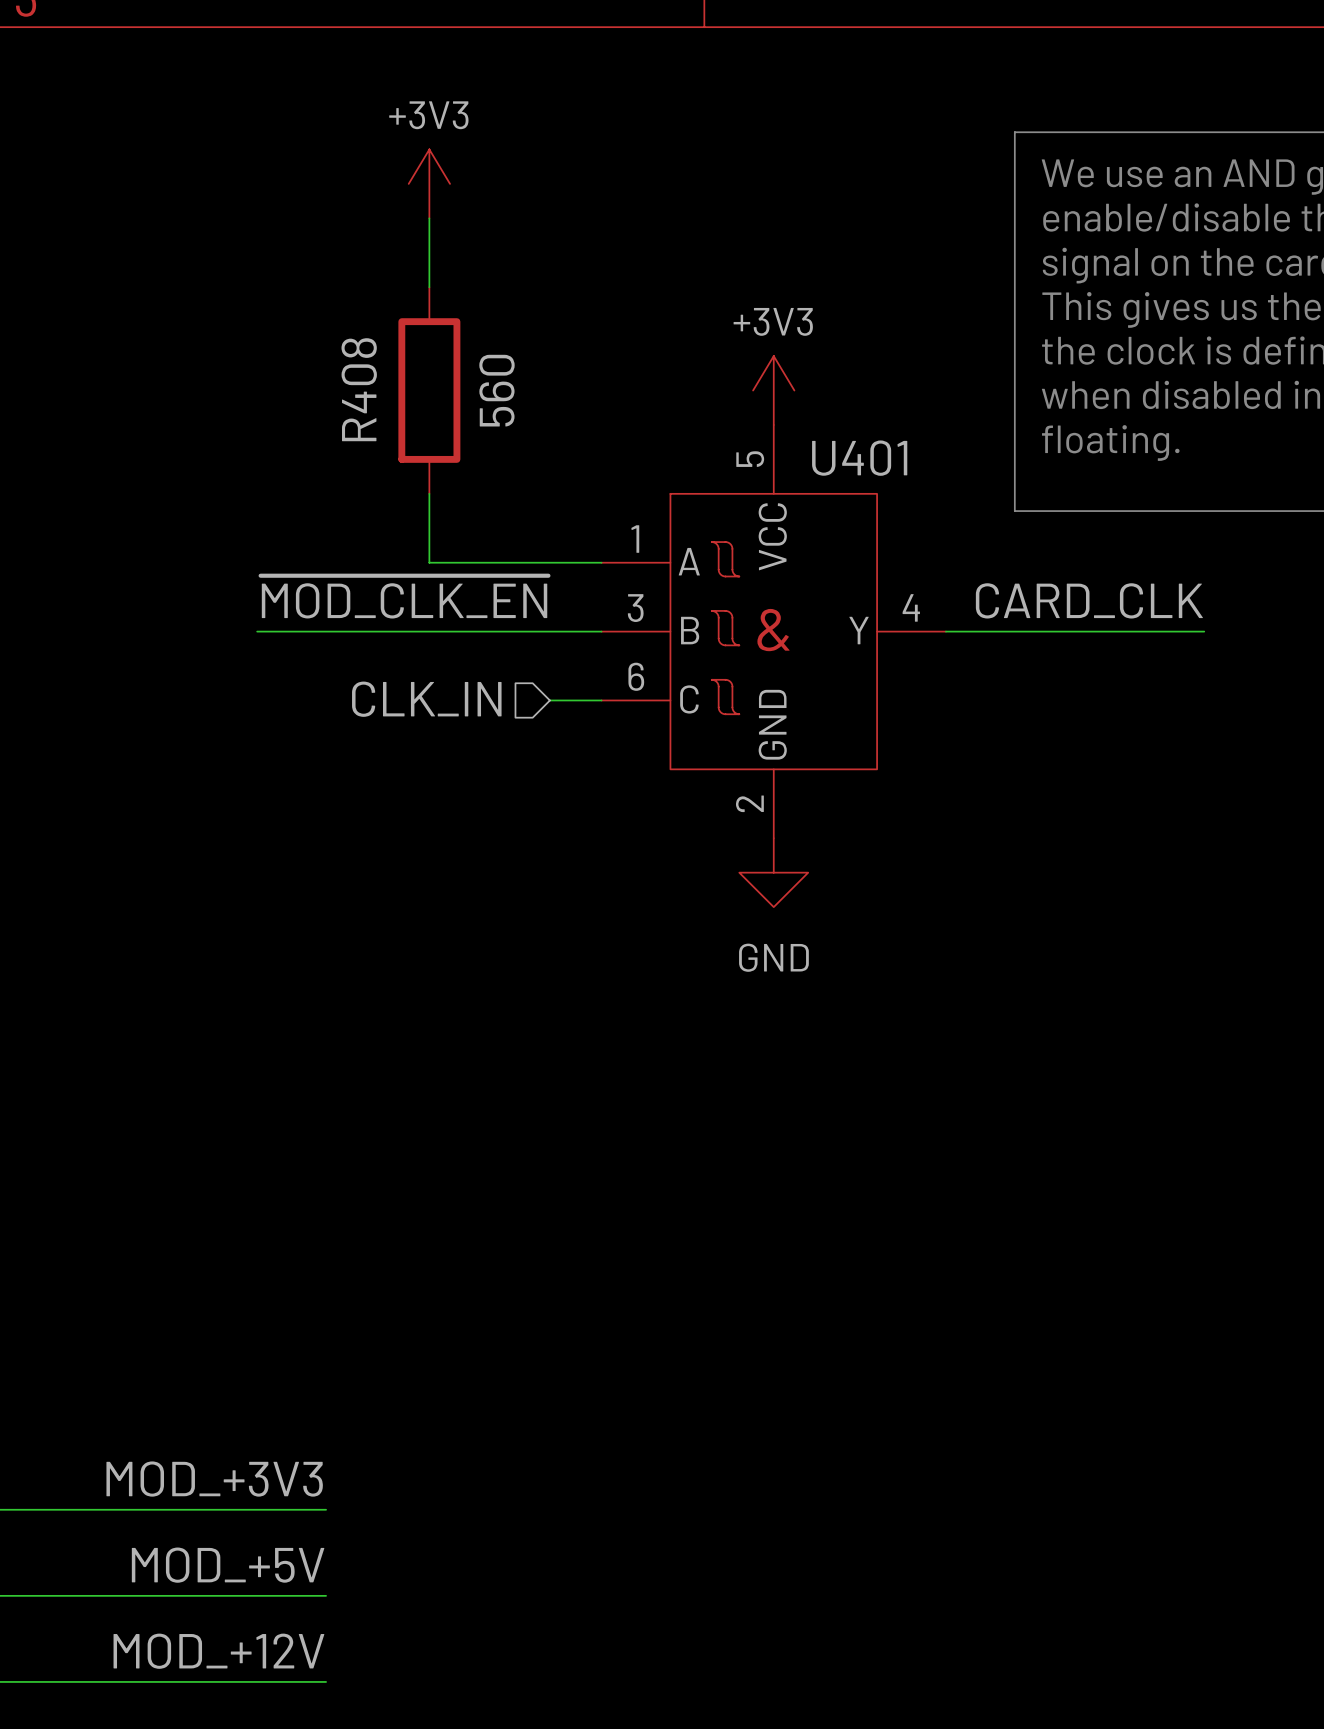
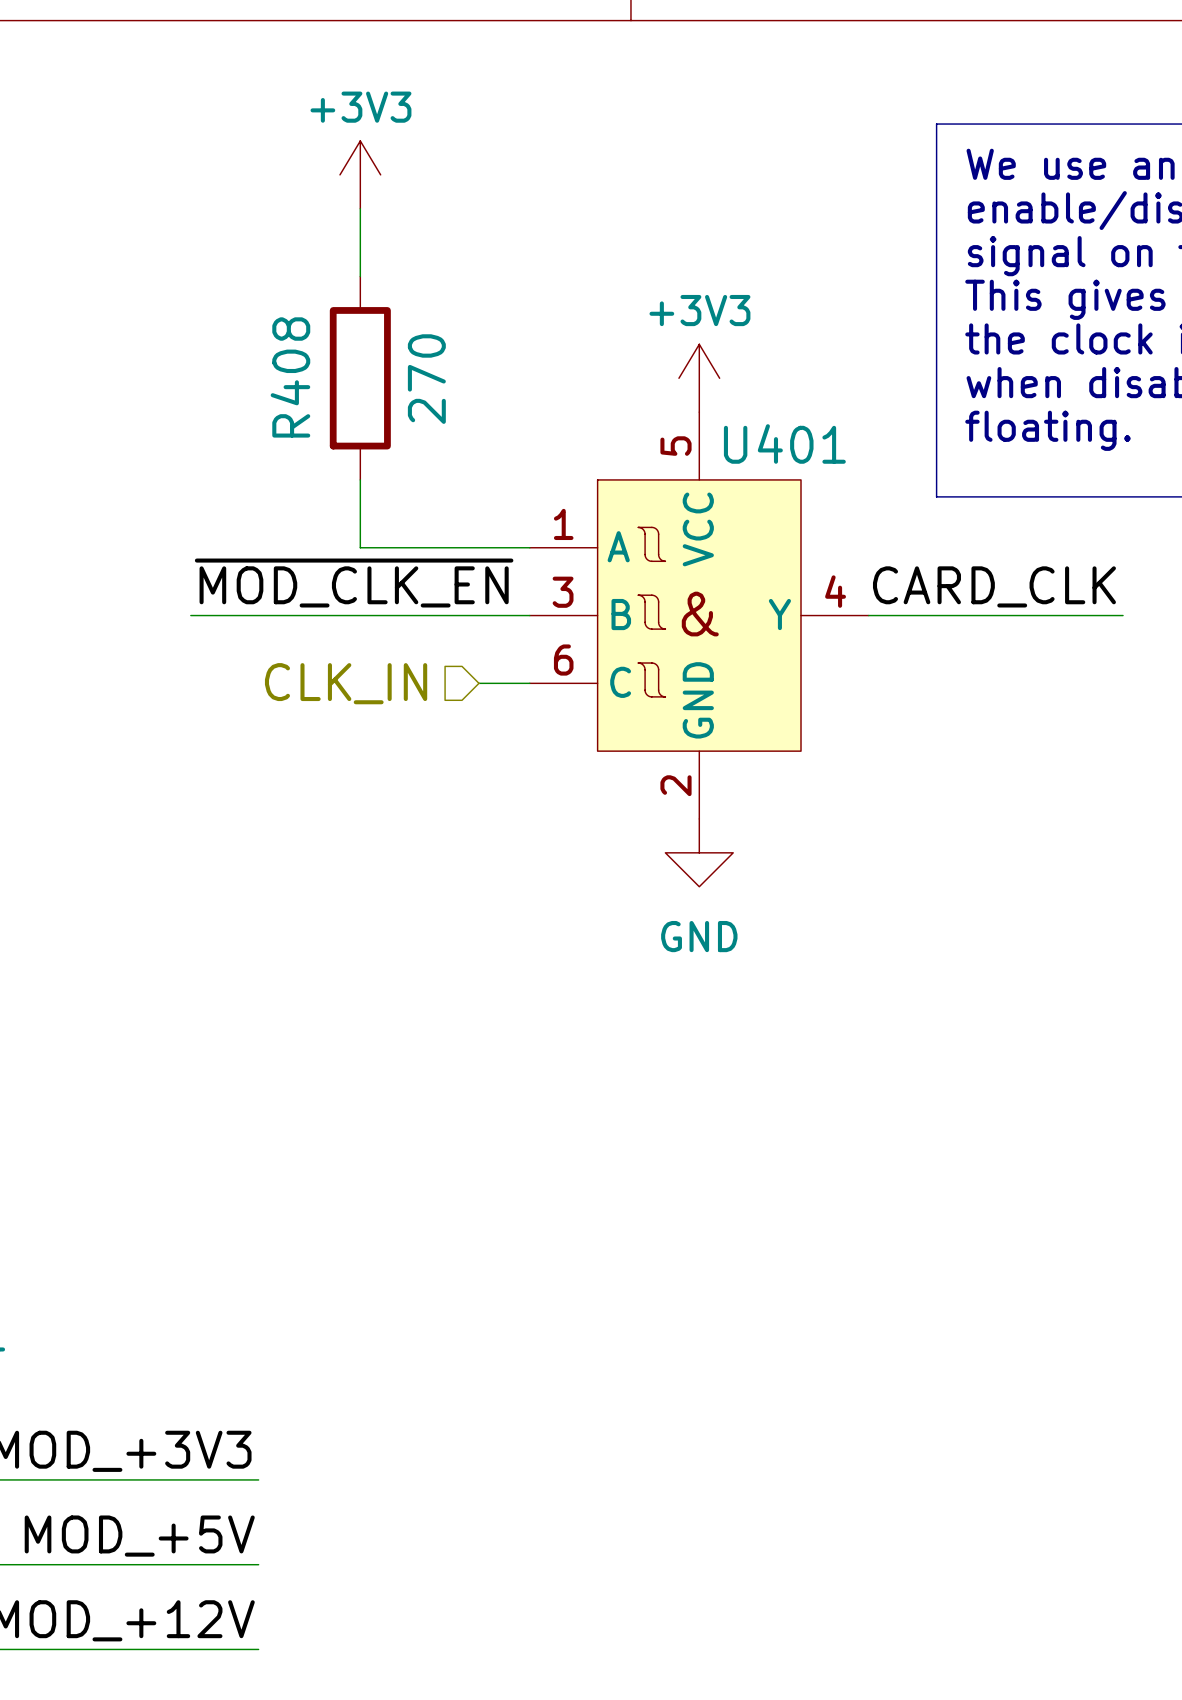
R408 value: 560 (496, 390) -> 270 (426, 379)

